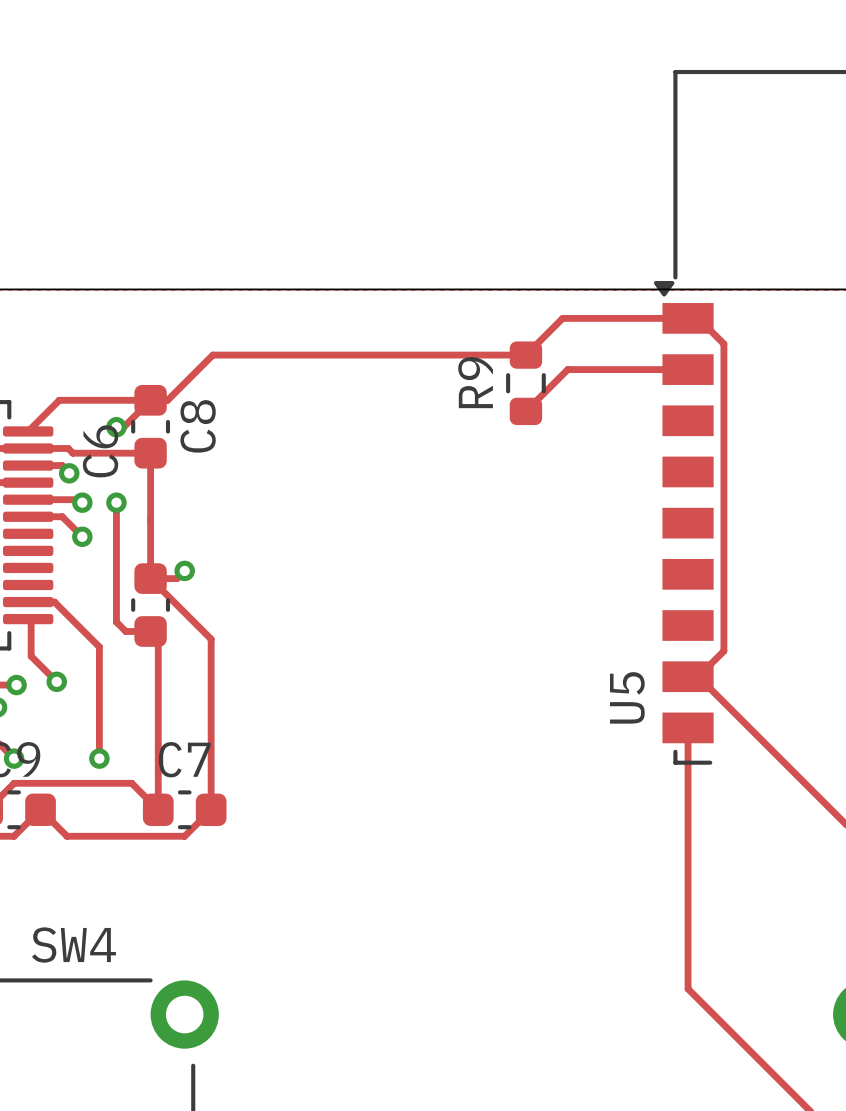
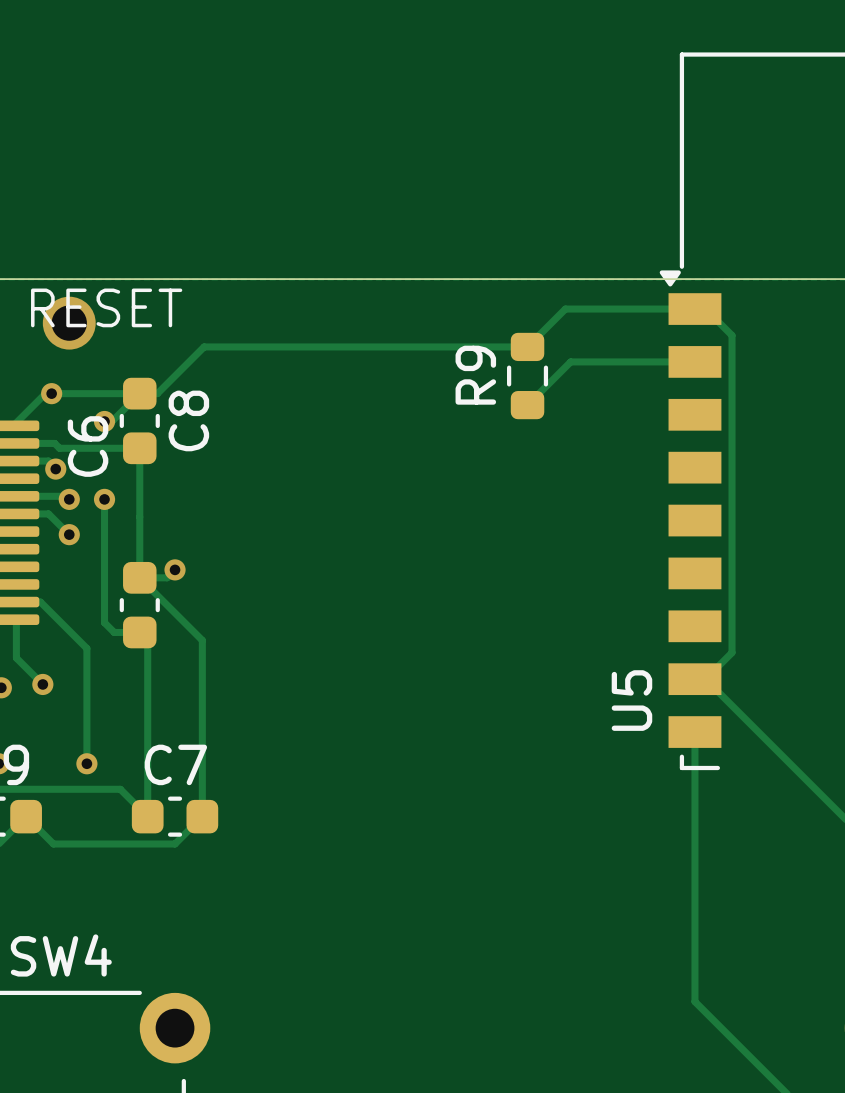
text: none -> RESET (106, 307)
via: none -> (69, 323)
via: none -> (51, 393)

